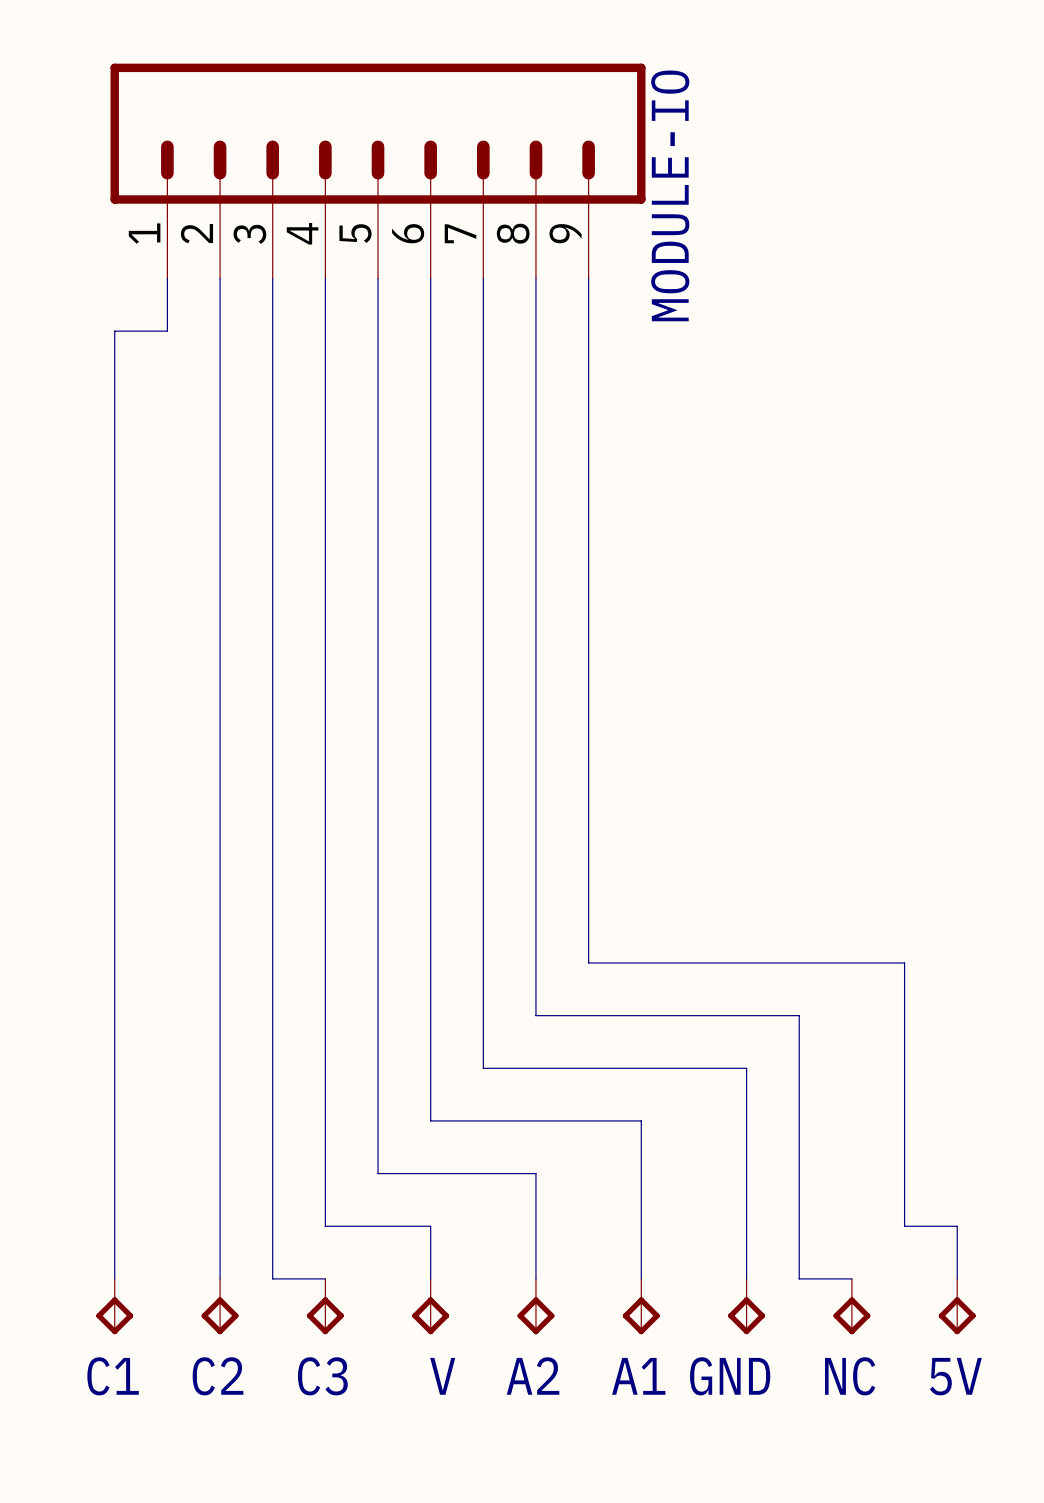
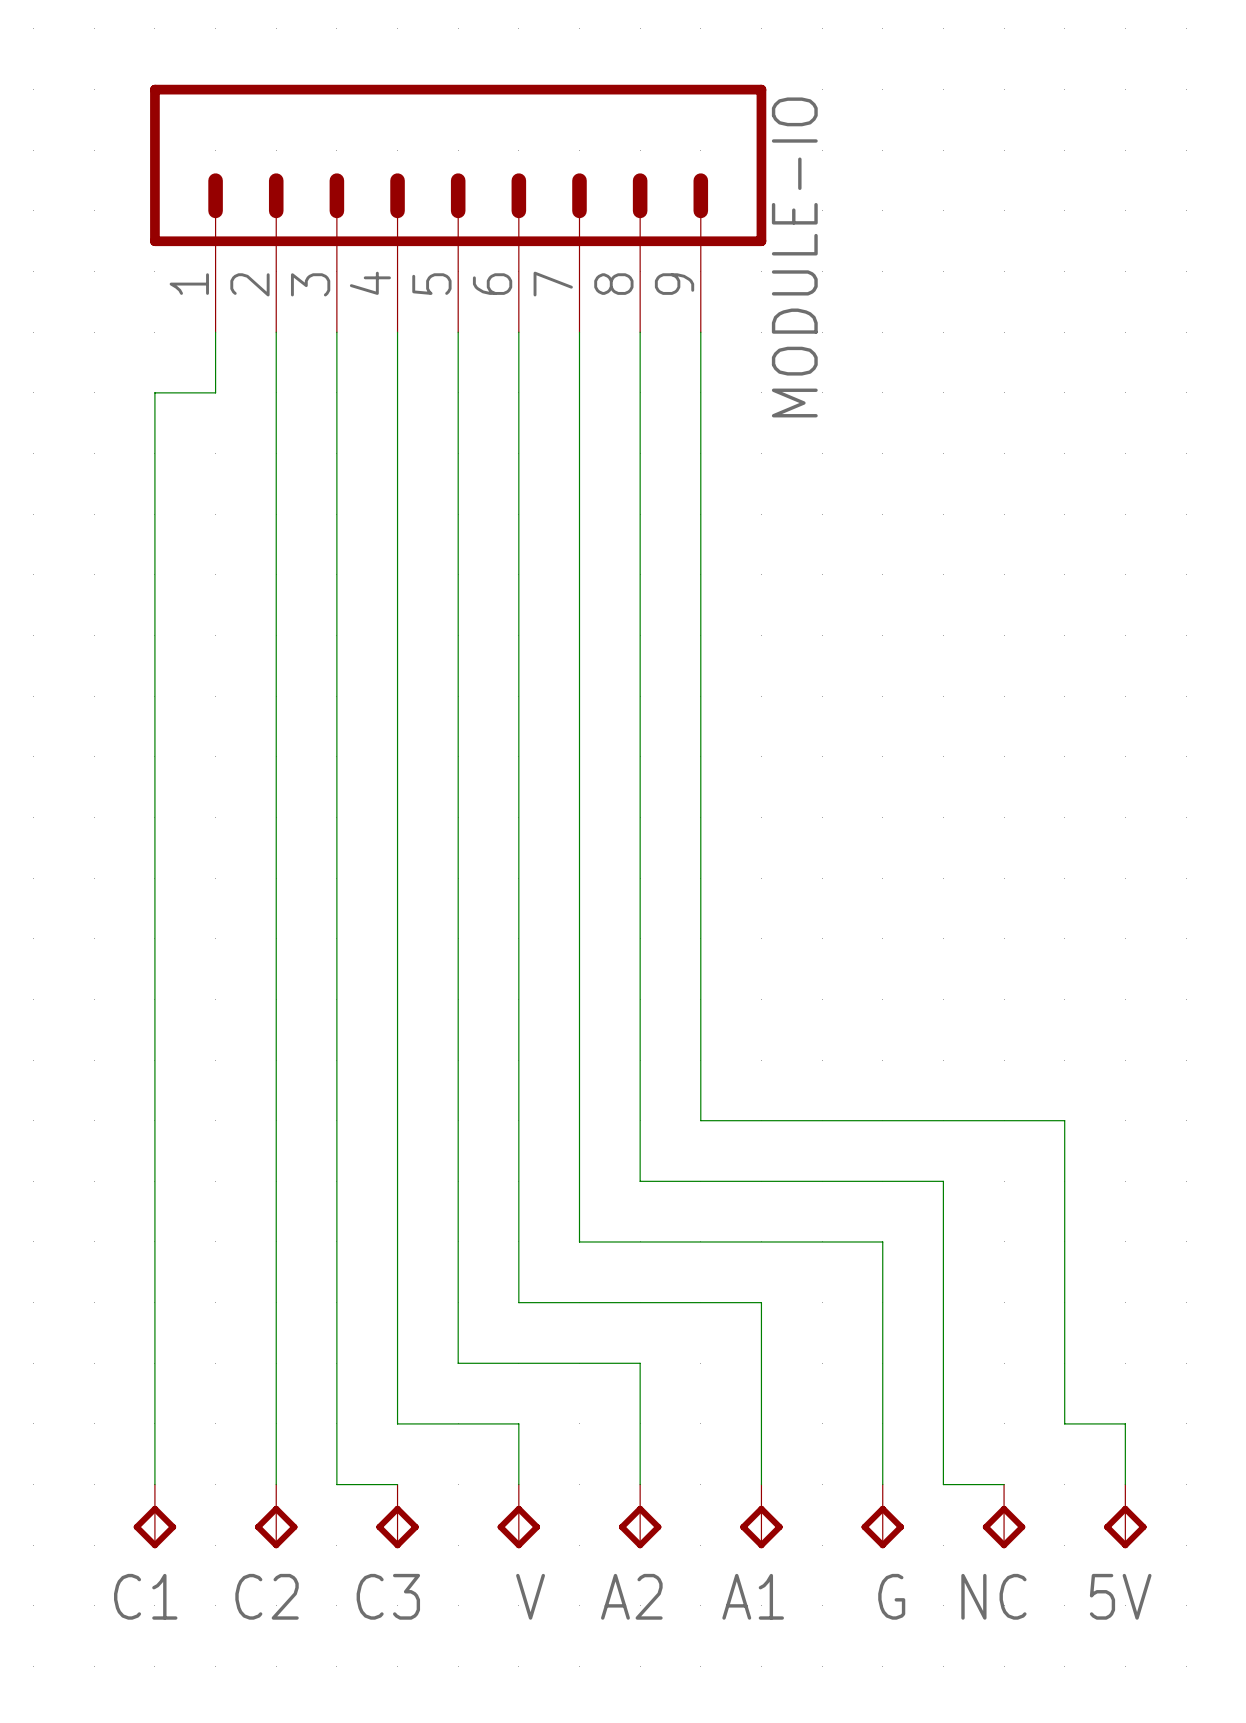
GND name: GND (730, 1376) -> G (891, 1596)

